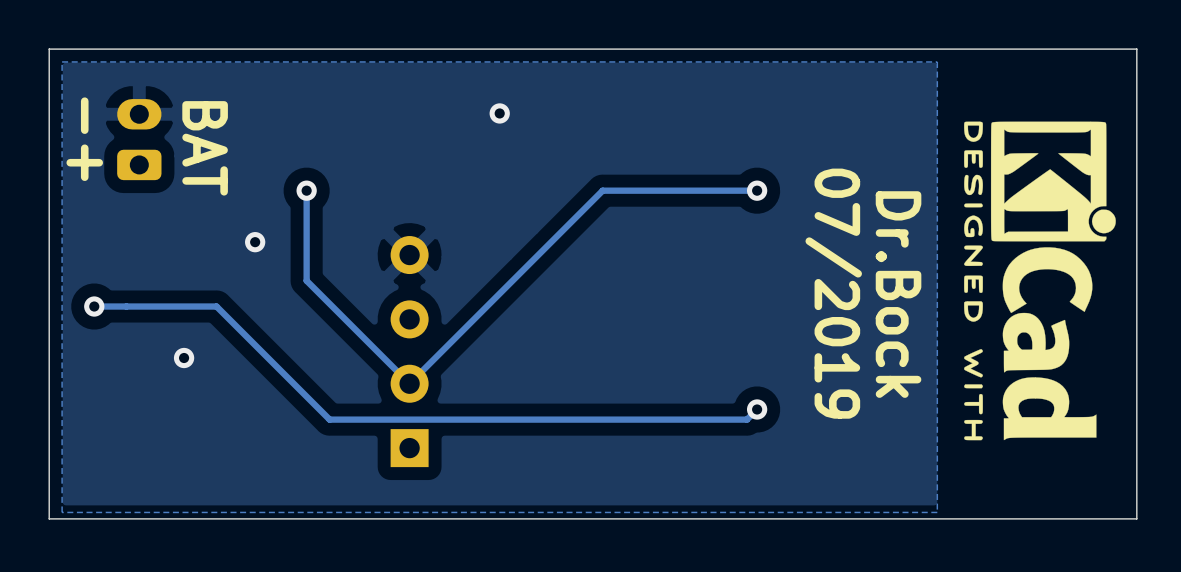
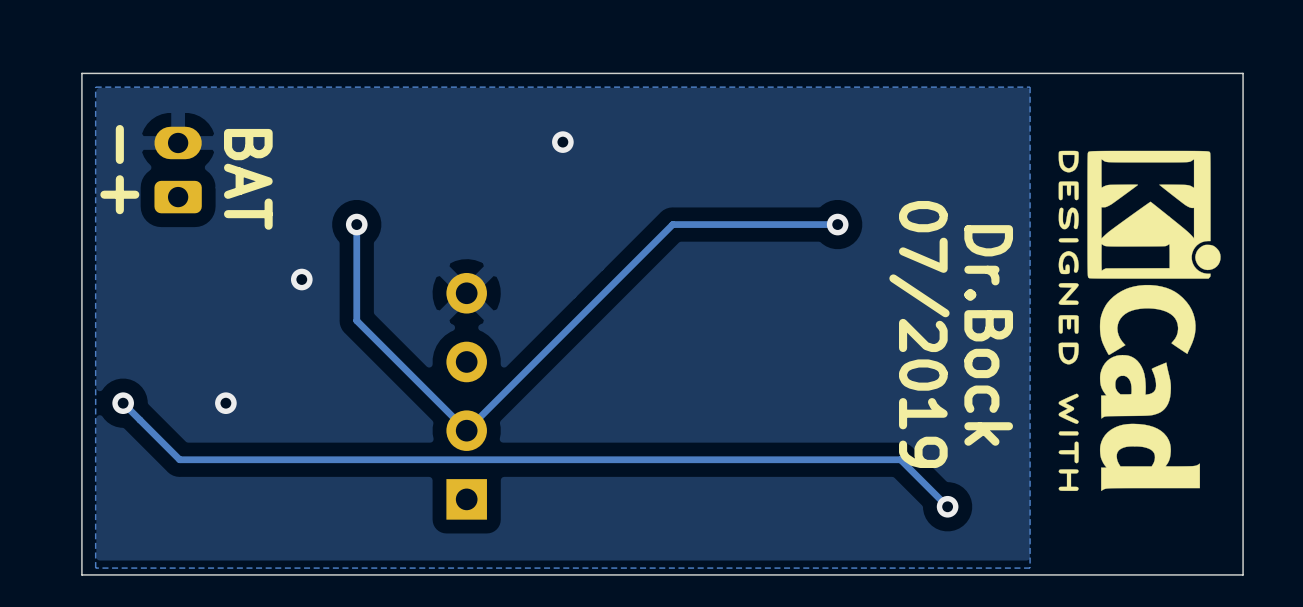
track: (87, 306) (216, 306) (329, 419) (746, 419) (757, 409) -> none
via position: (94, 306) -> (123, 403)
track: none -> (123, 403) (179, 459) (900, 459) (947, 506)
via position: (757, 409) -> (947, 506)

